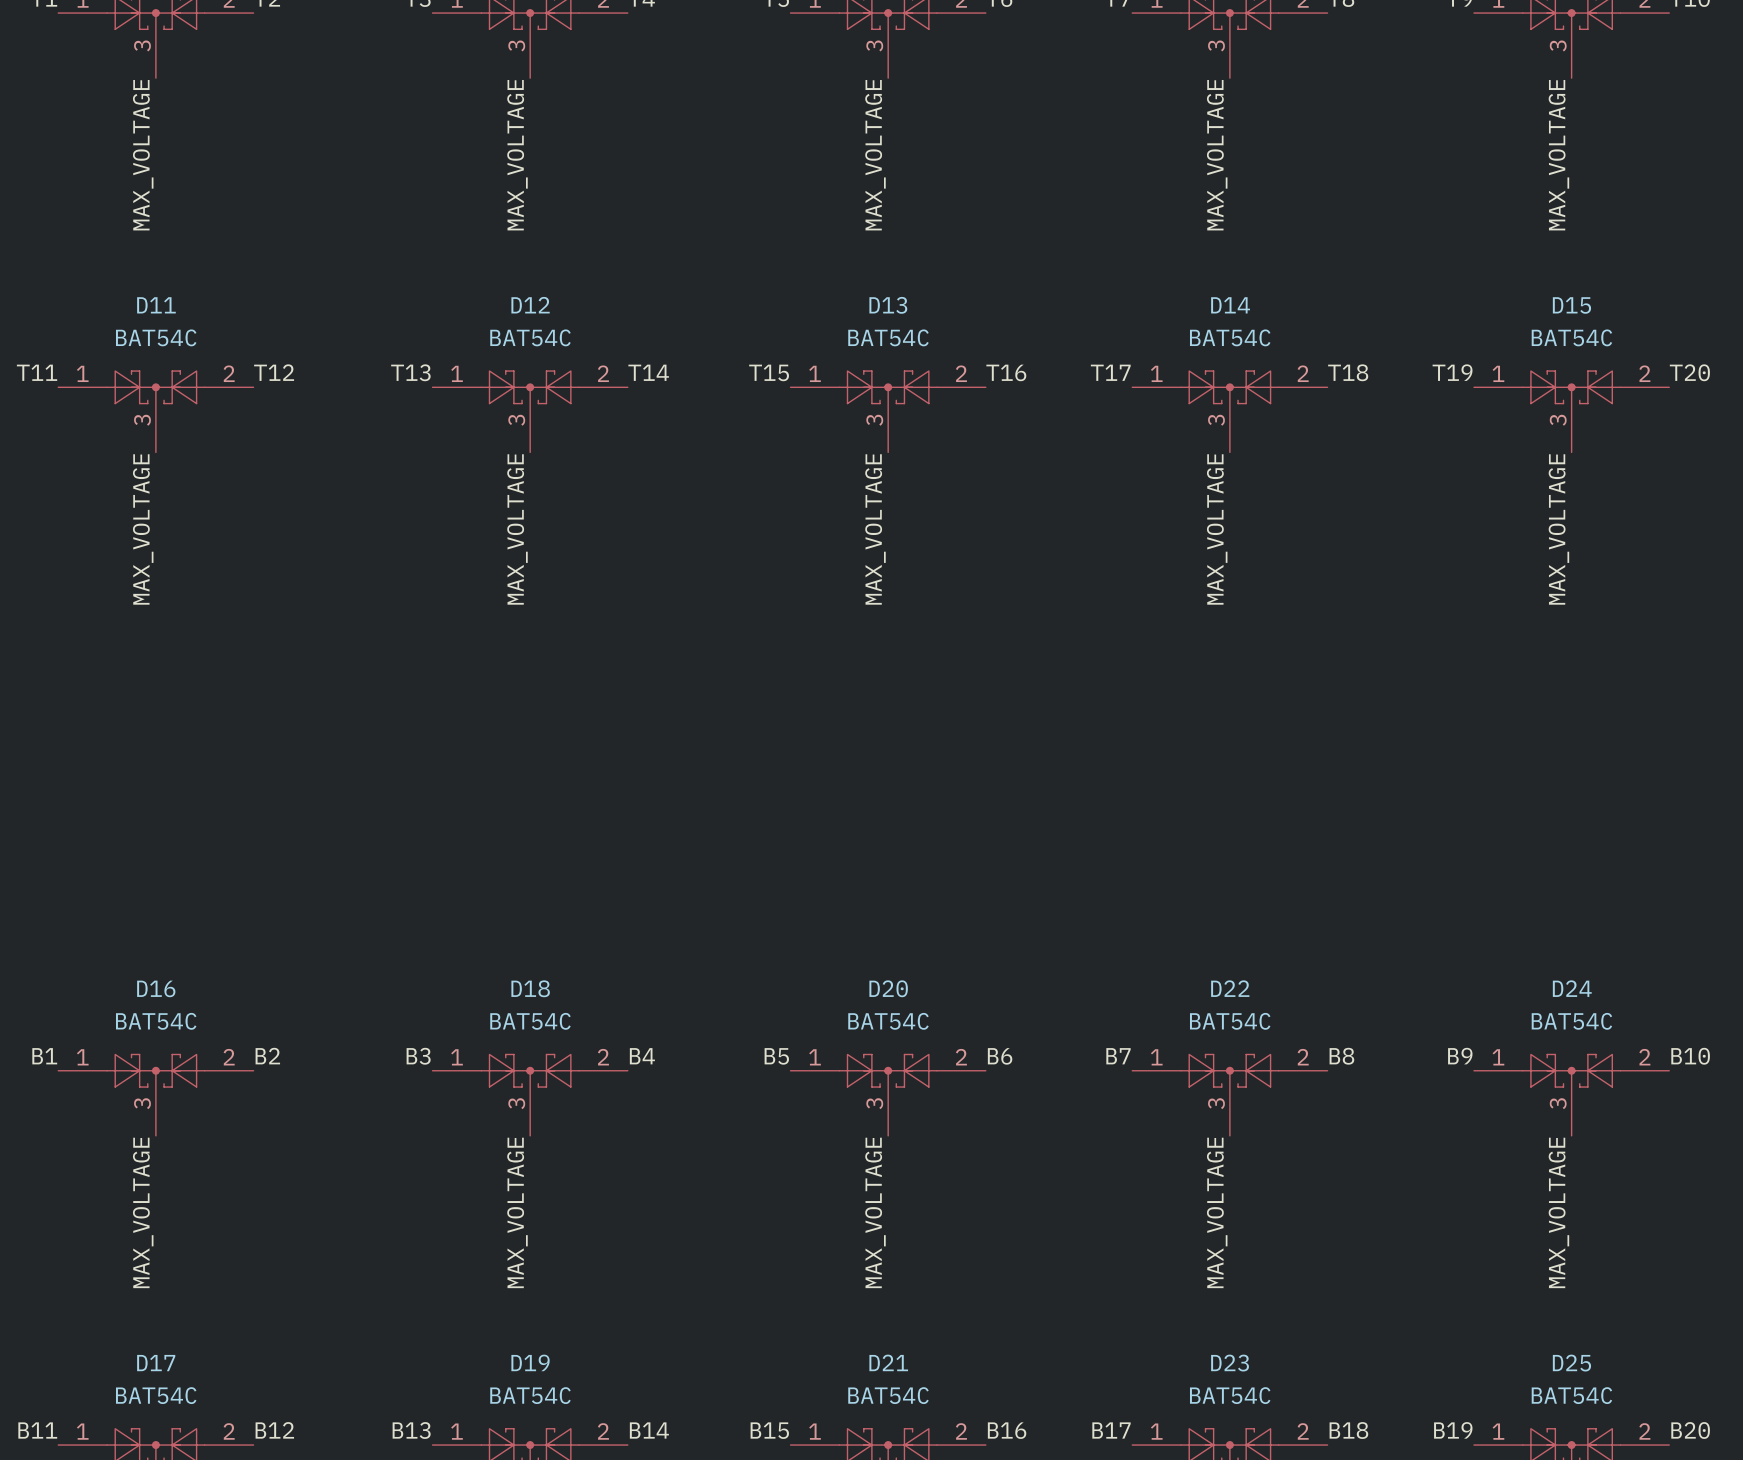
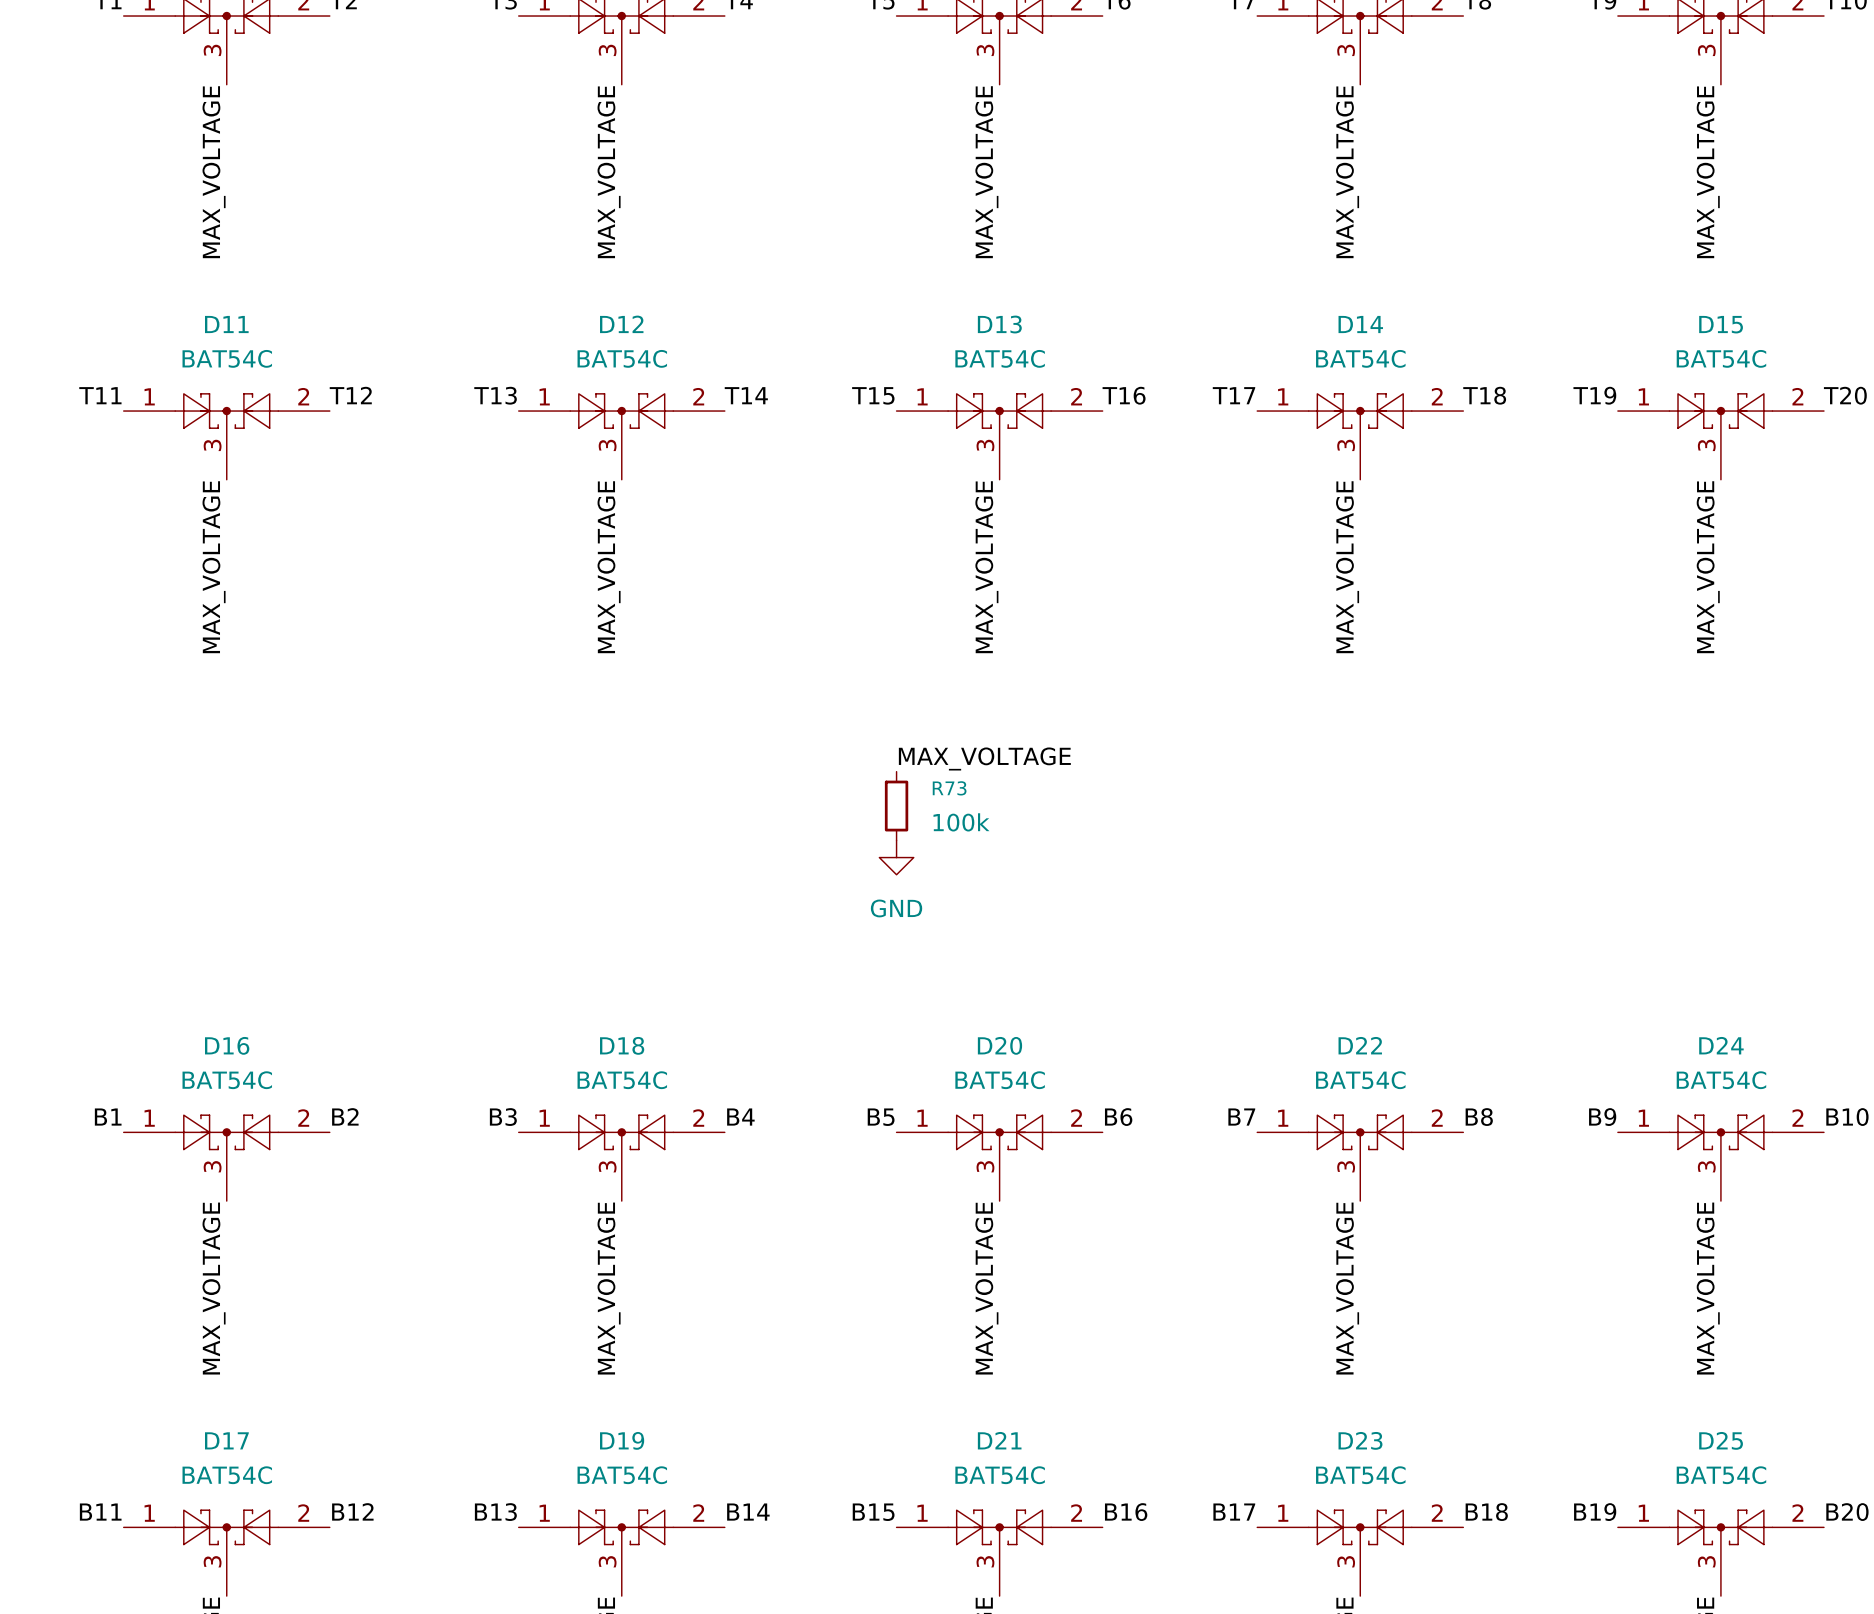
label: none -> MAX_VOLTAGE (984, 758)
R73: none -> 100k (896, 806)
power symbol: none -> GND (896, 857)

